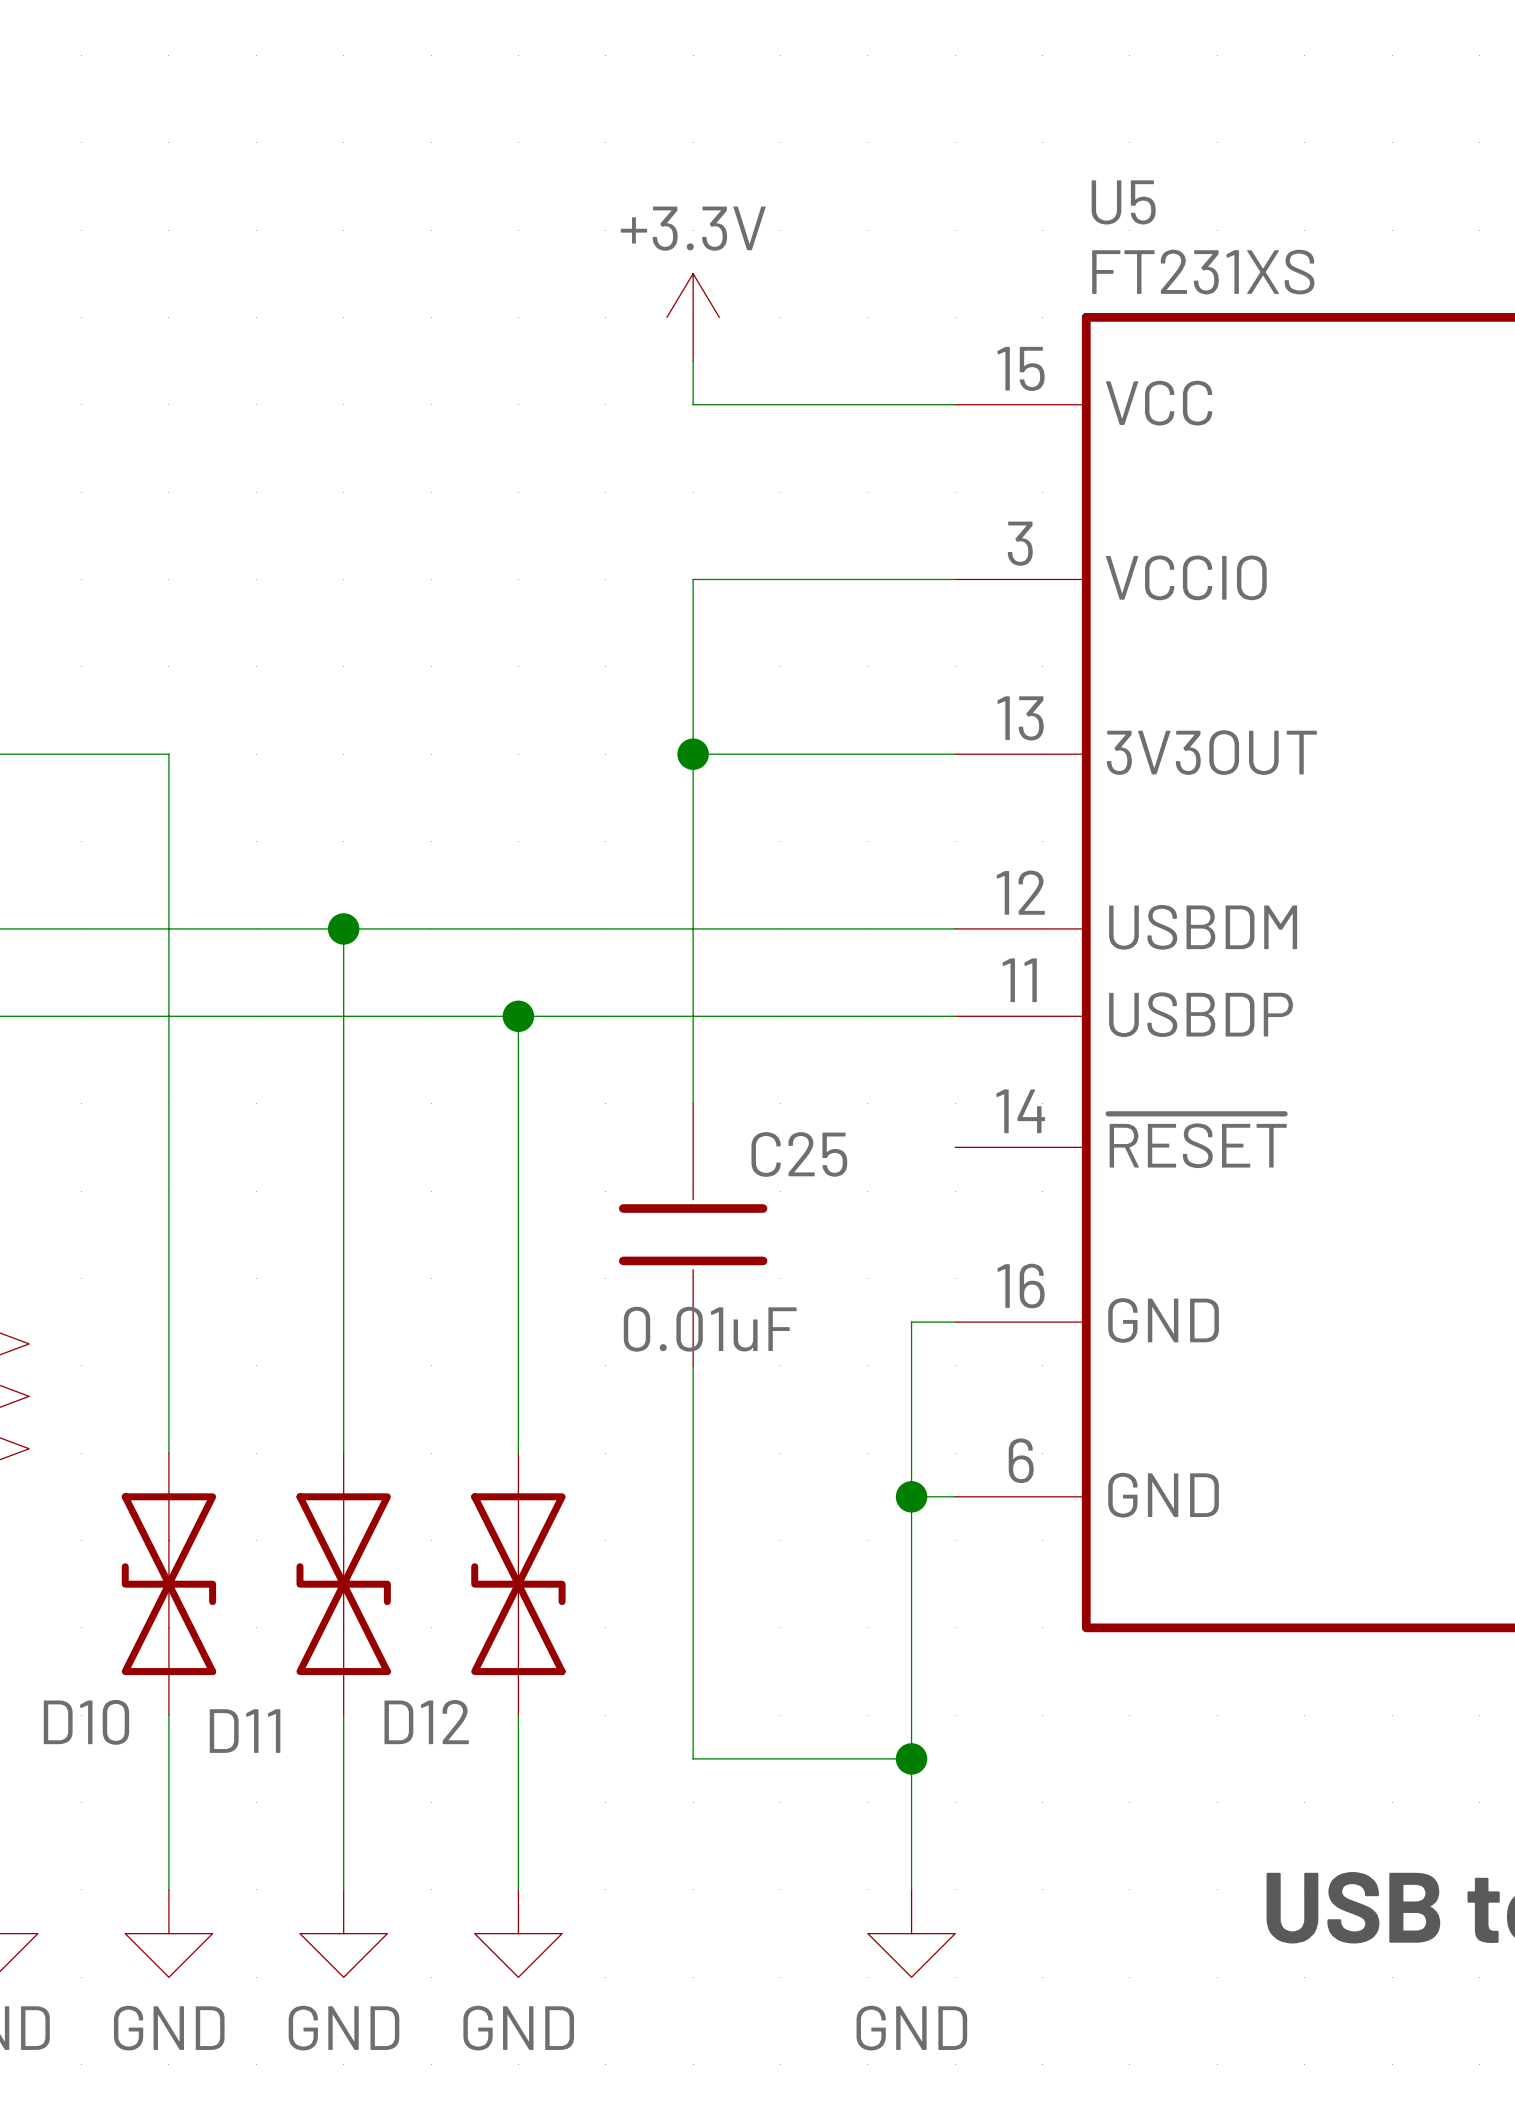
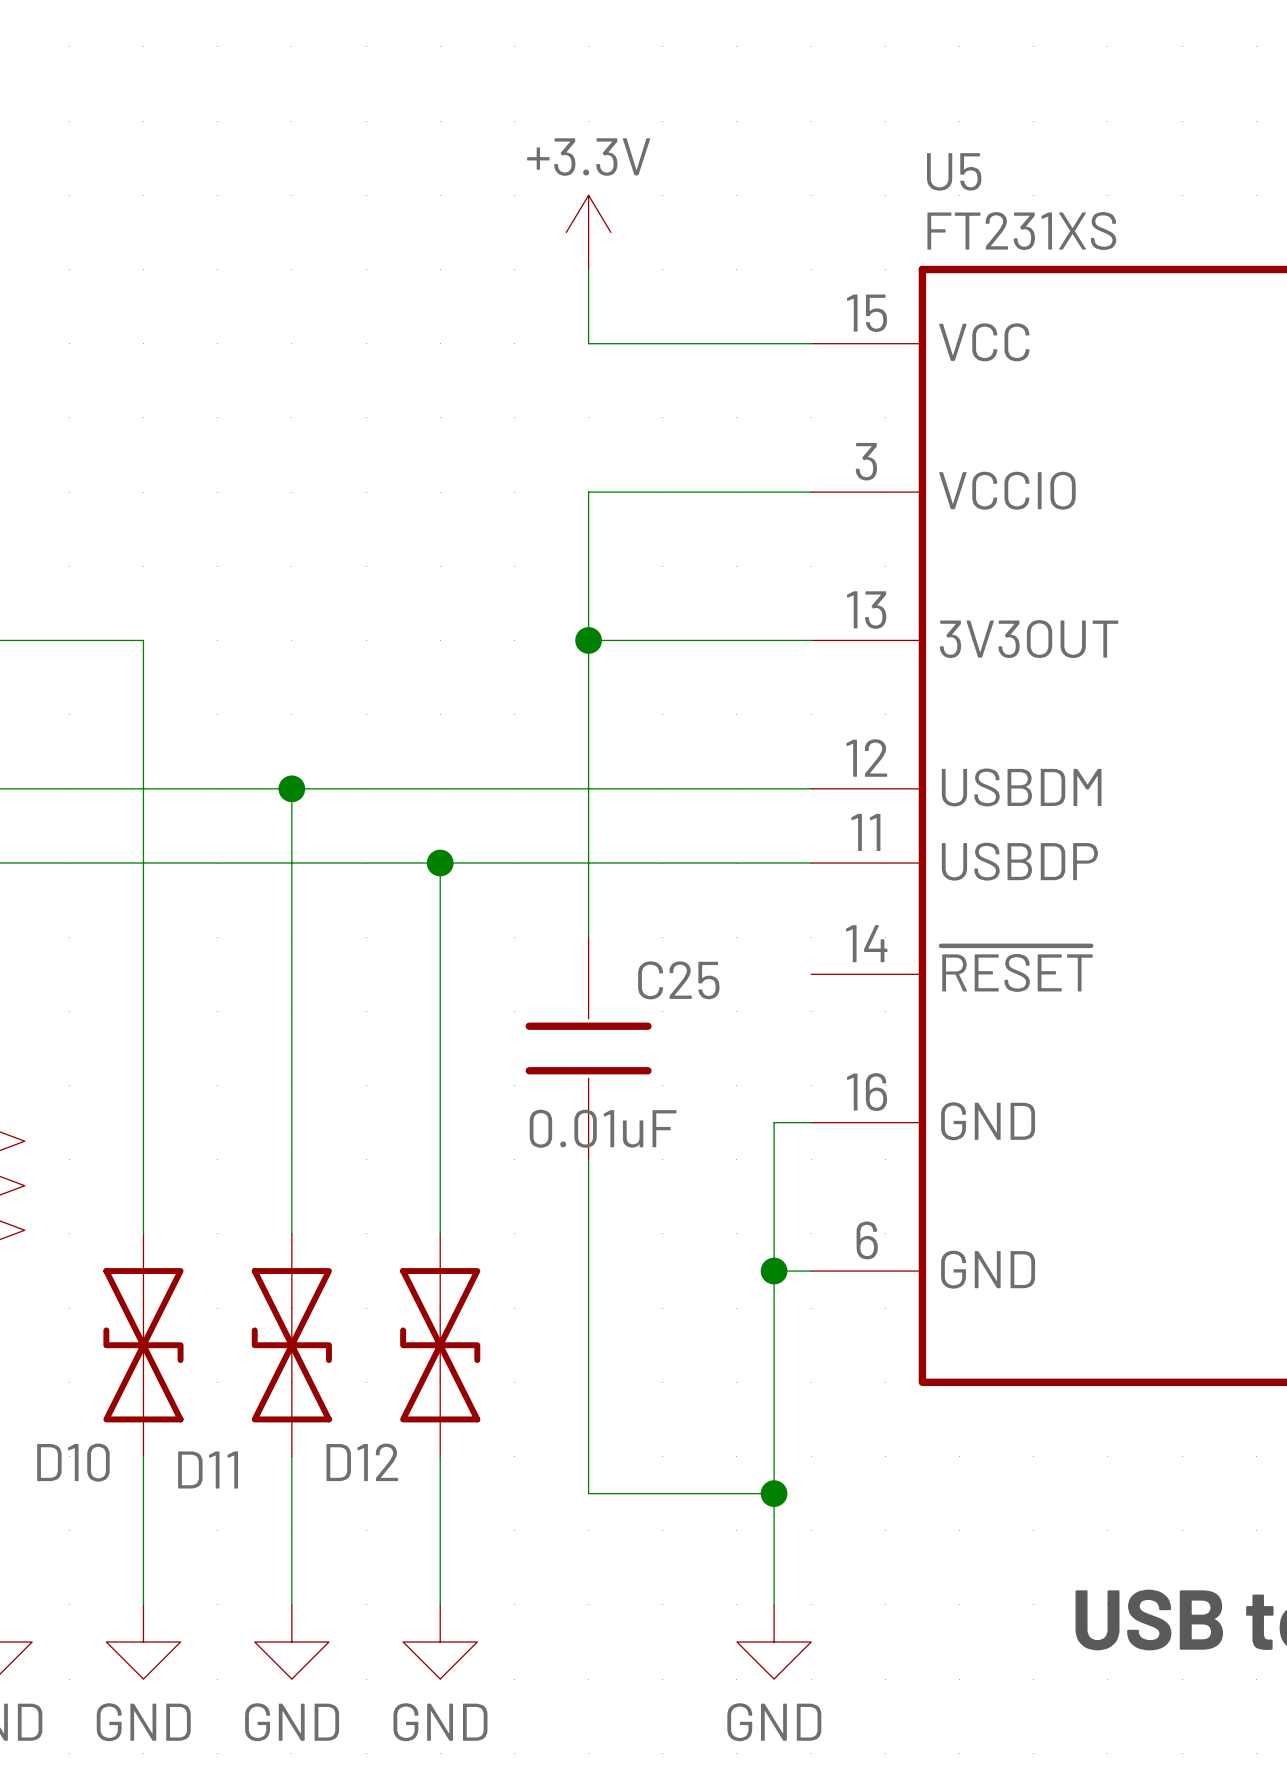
power symbol position: +3.3V (693, 317) -> +3.3V (588, 232)

